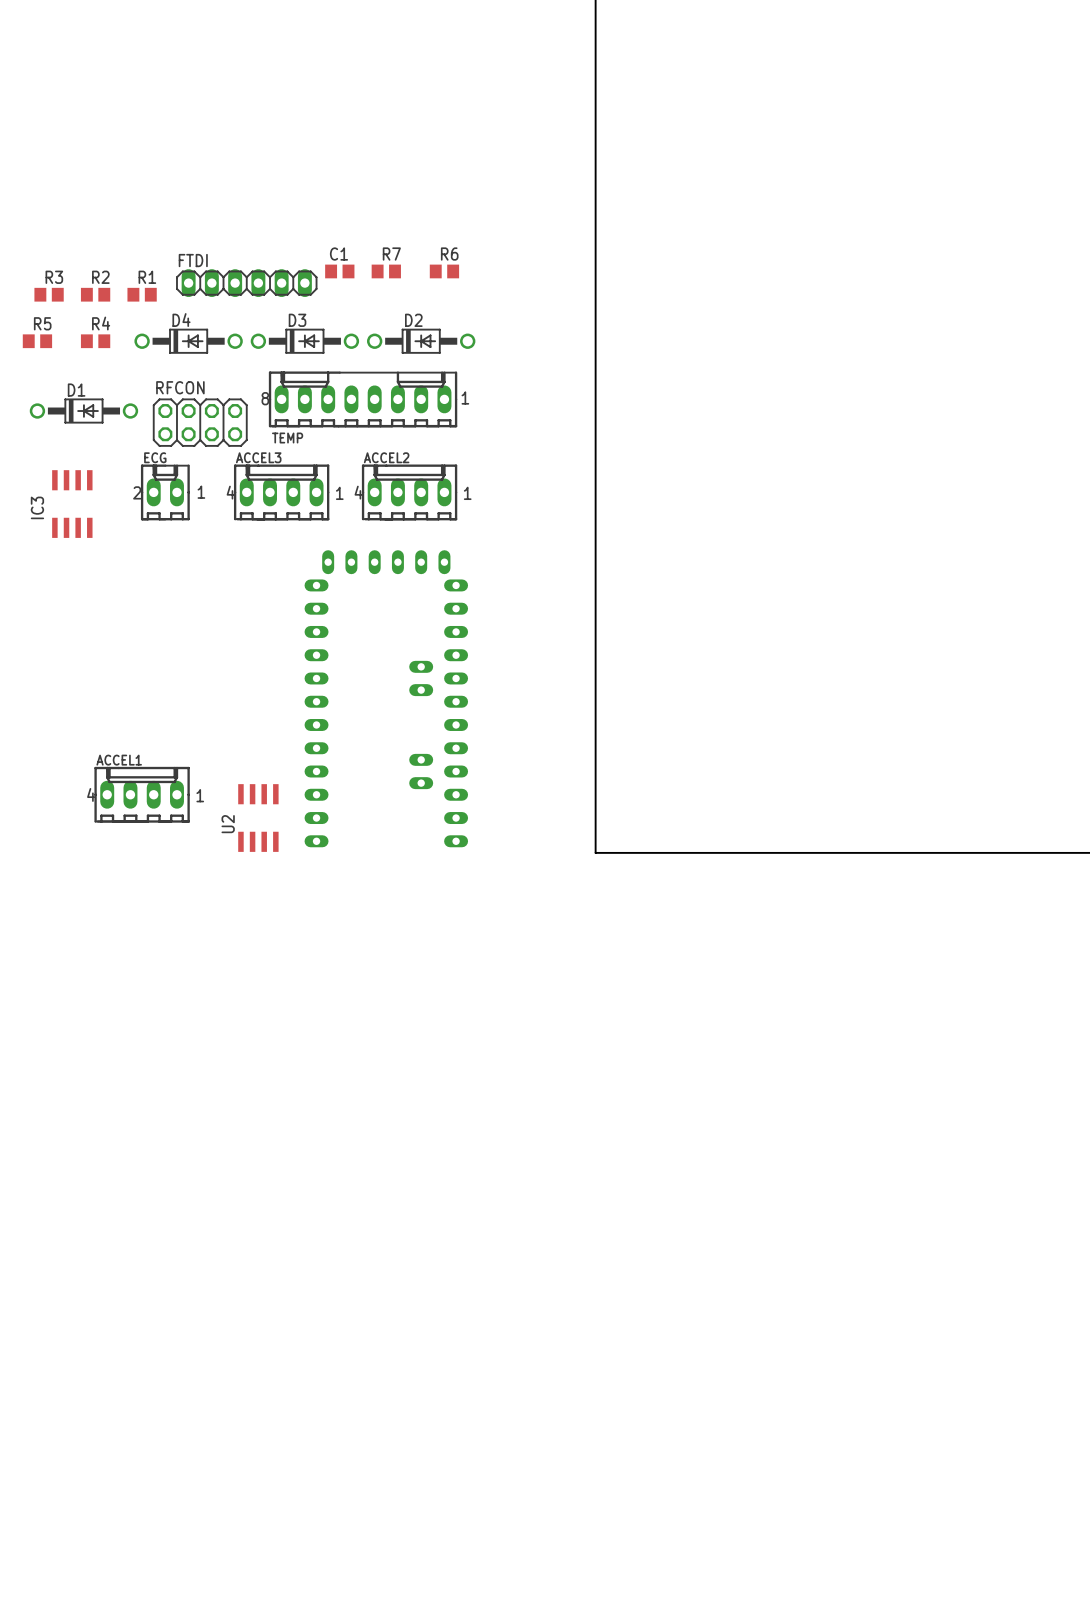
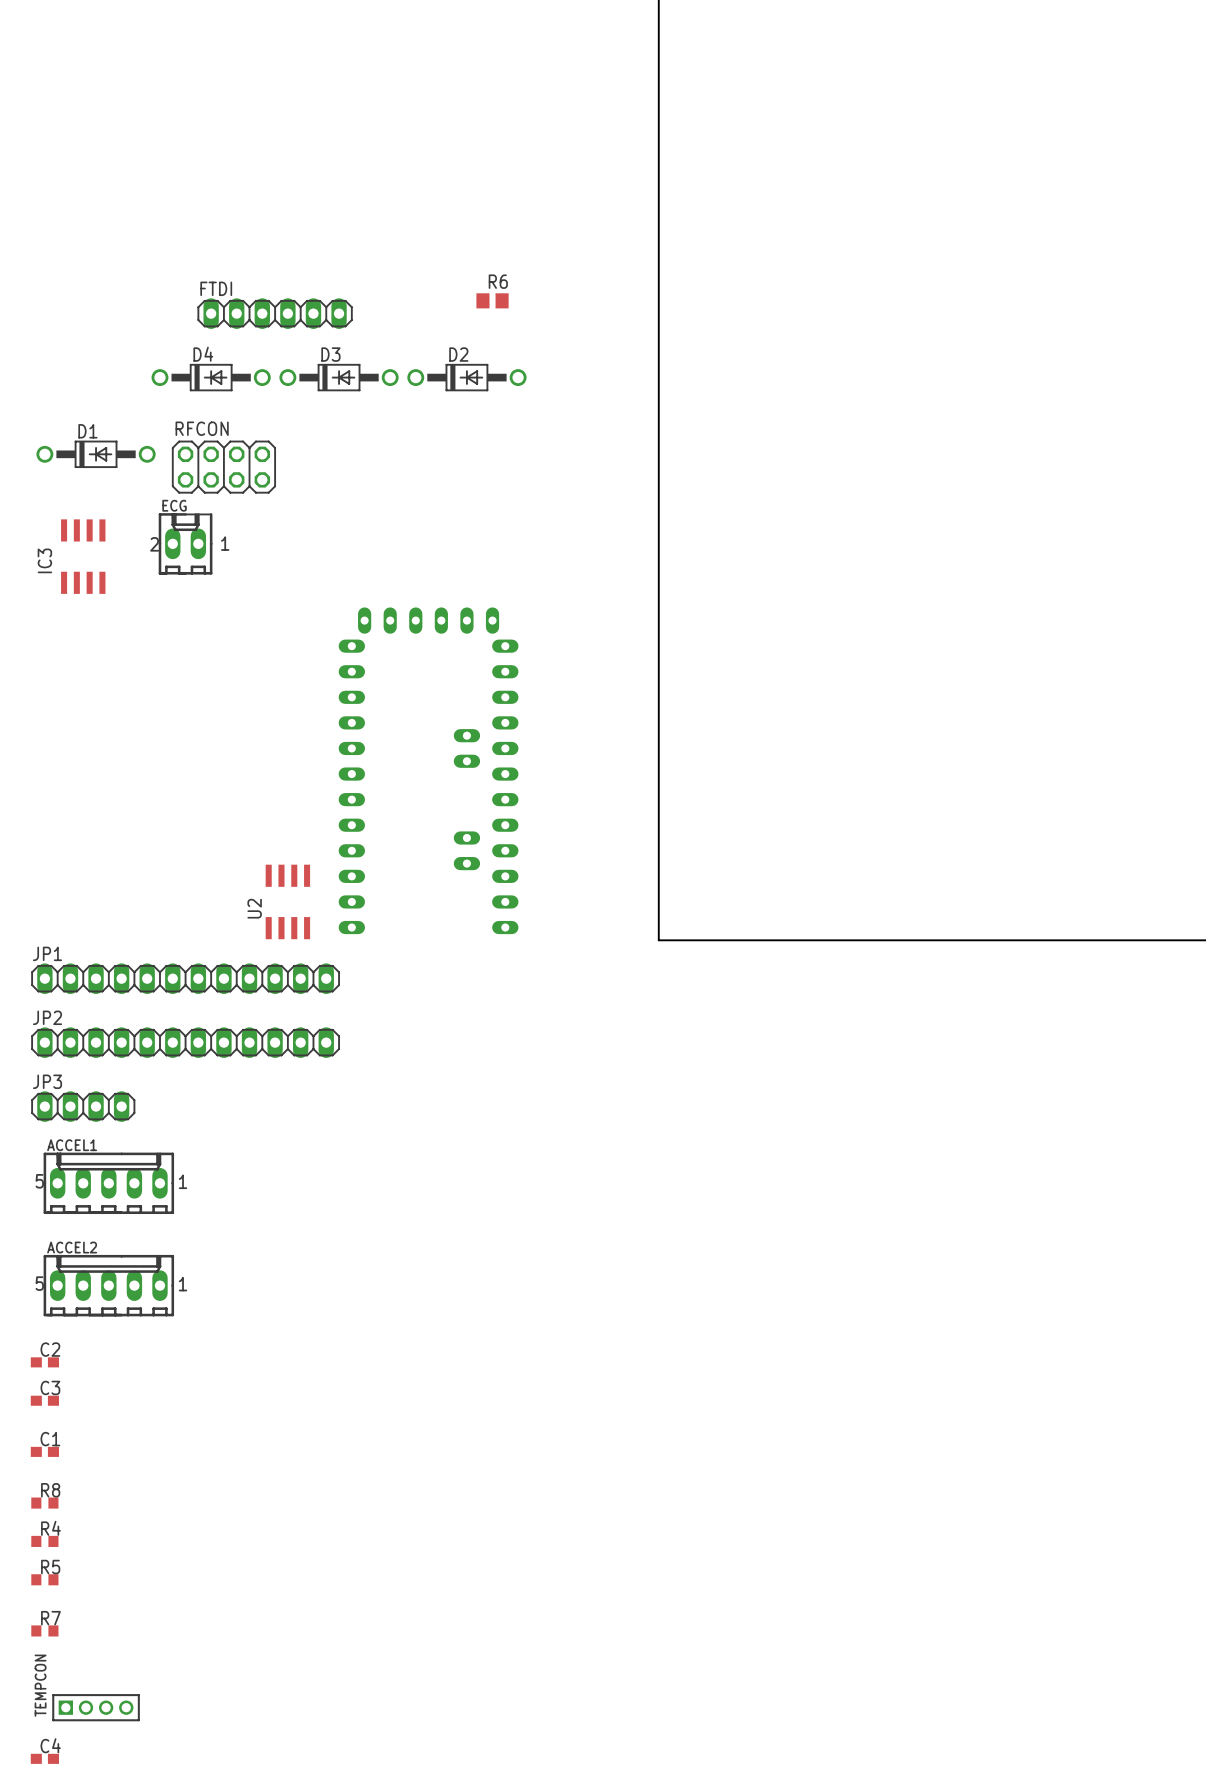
C1 footprint: [325, 264, 355, 279] -> [30, 1446, 59, 1457]
R7 footprint: [371, 264, 401, 279] -> [31, 1625, 59, 1637]
R3: (49, 294) -> none
R2: (95, 294) -> none
R1: (142, 294) -> none
R5 footprint: [22, 334, 53, 349] -> [31, 1574, 59, 1586]
R4 footprint: [80, 334, 111, 349] -> [31, 1535, 59, 1547]
TEMP: (363, 399) -> none
ACCEL2 footprint: [361, 464, 458, 521] -> [43, 1254, 175, 1317]
ACCEL3: (281, 492) -> none
ACCEL1 footprint: [94, 766, 190, 823] -> [43, 1152, 175, 1215]
JP1: none -> (185, 978)
JP2: none -> (185, 1042)
JP3: none -> (83, 1106)
C2: none -> (44, 1362)
C3: none -> (44, 1400)
R8: none -> (44, 1503)
TEMPCON: none -> (96, 1707)
C4: none -> (44, 1758)

